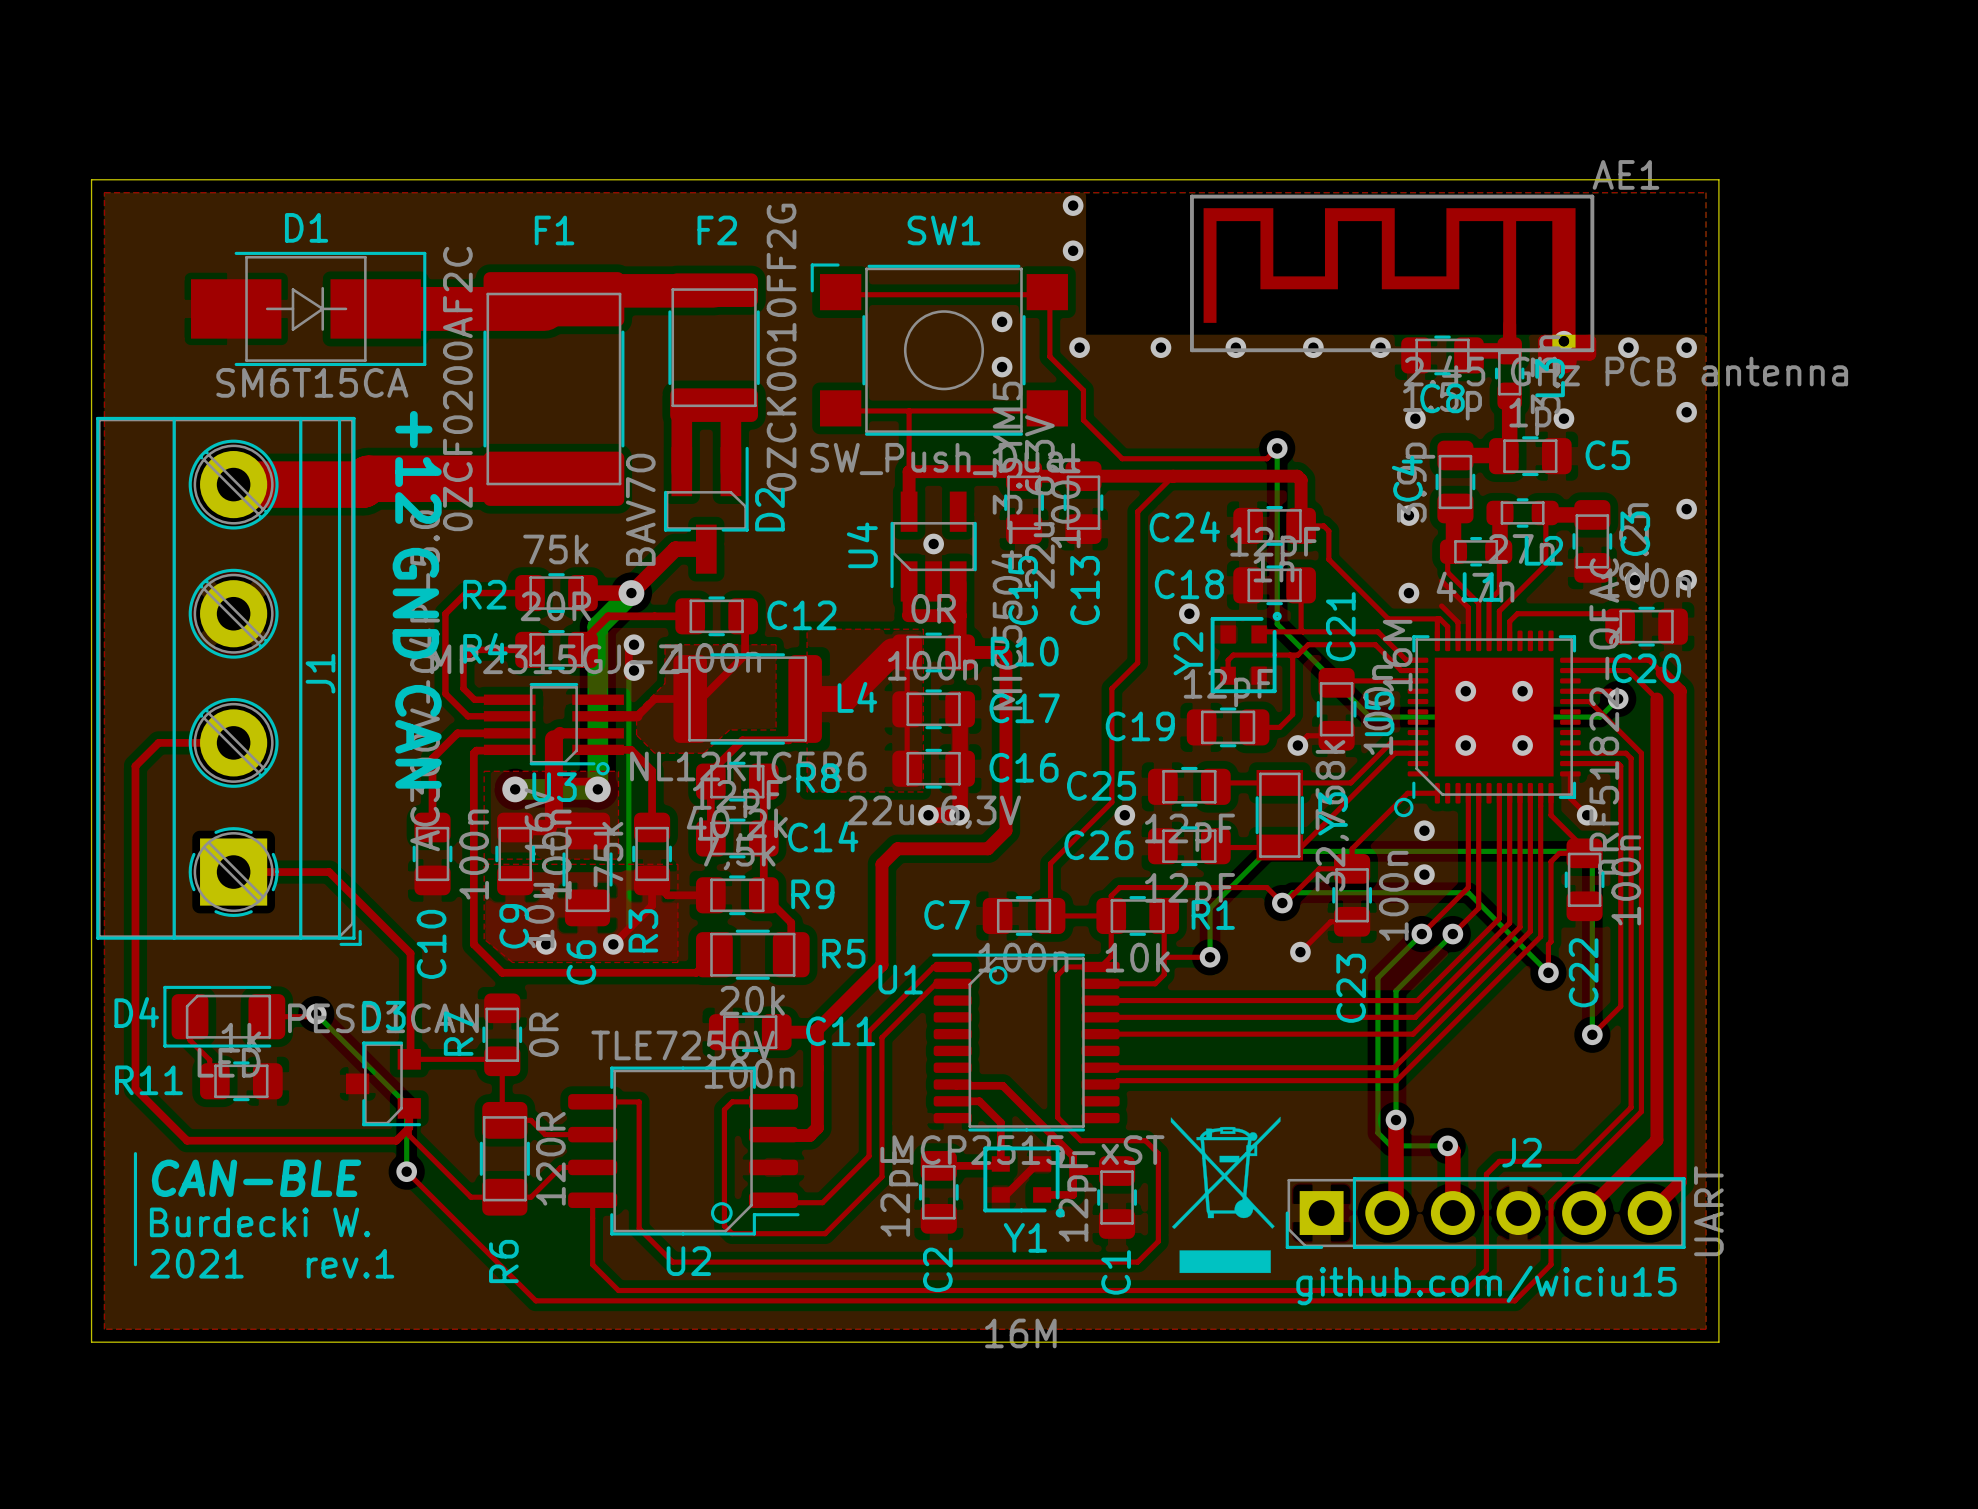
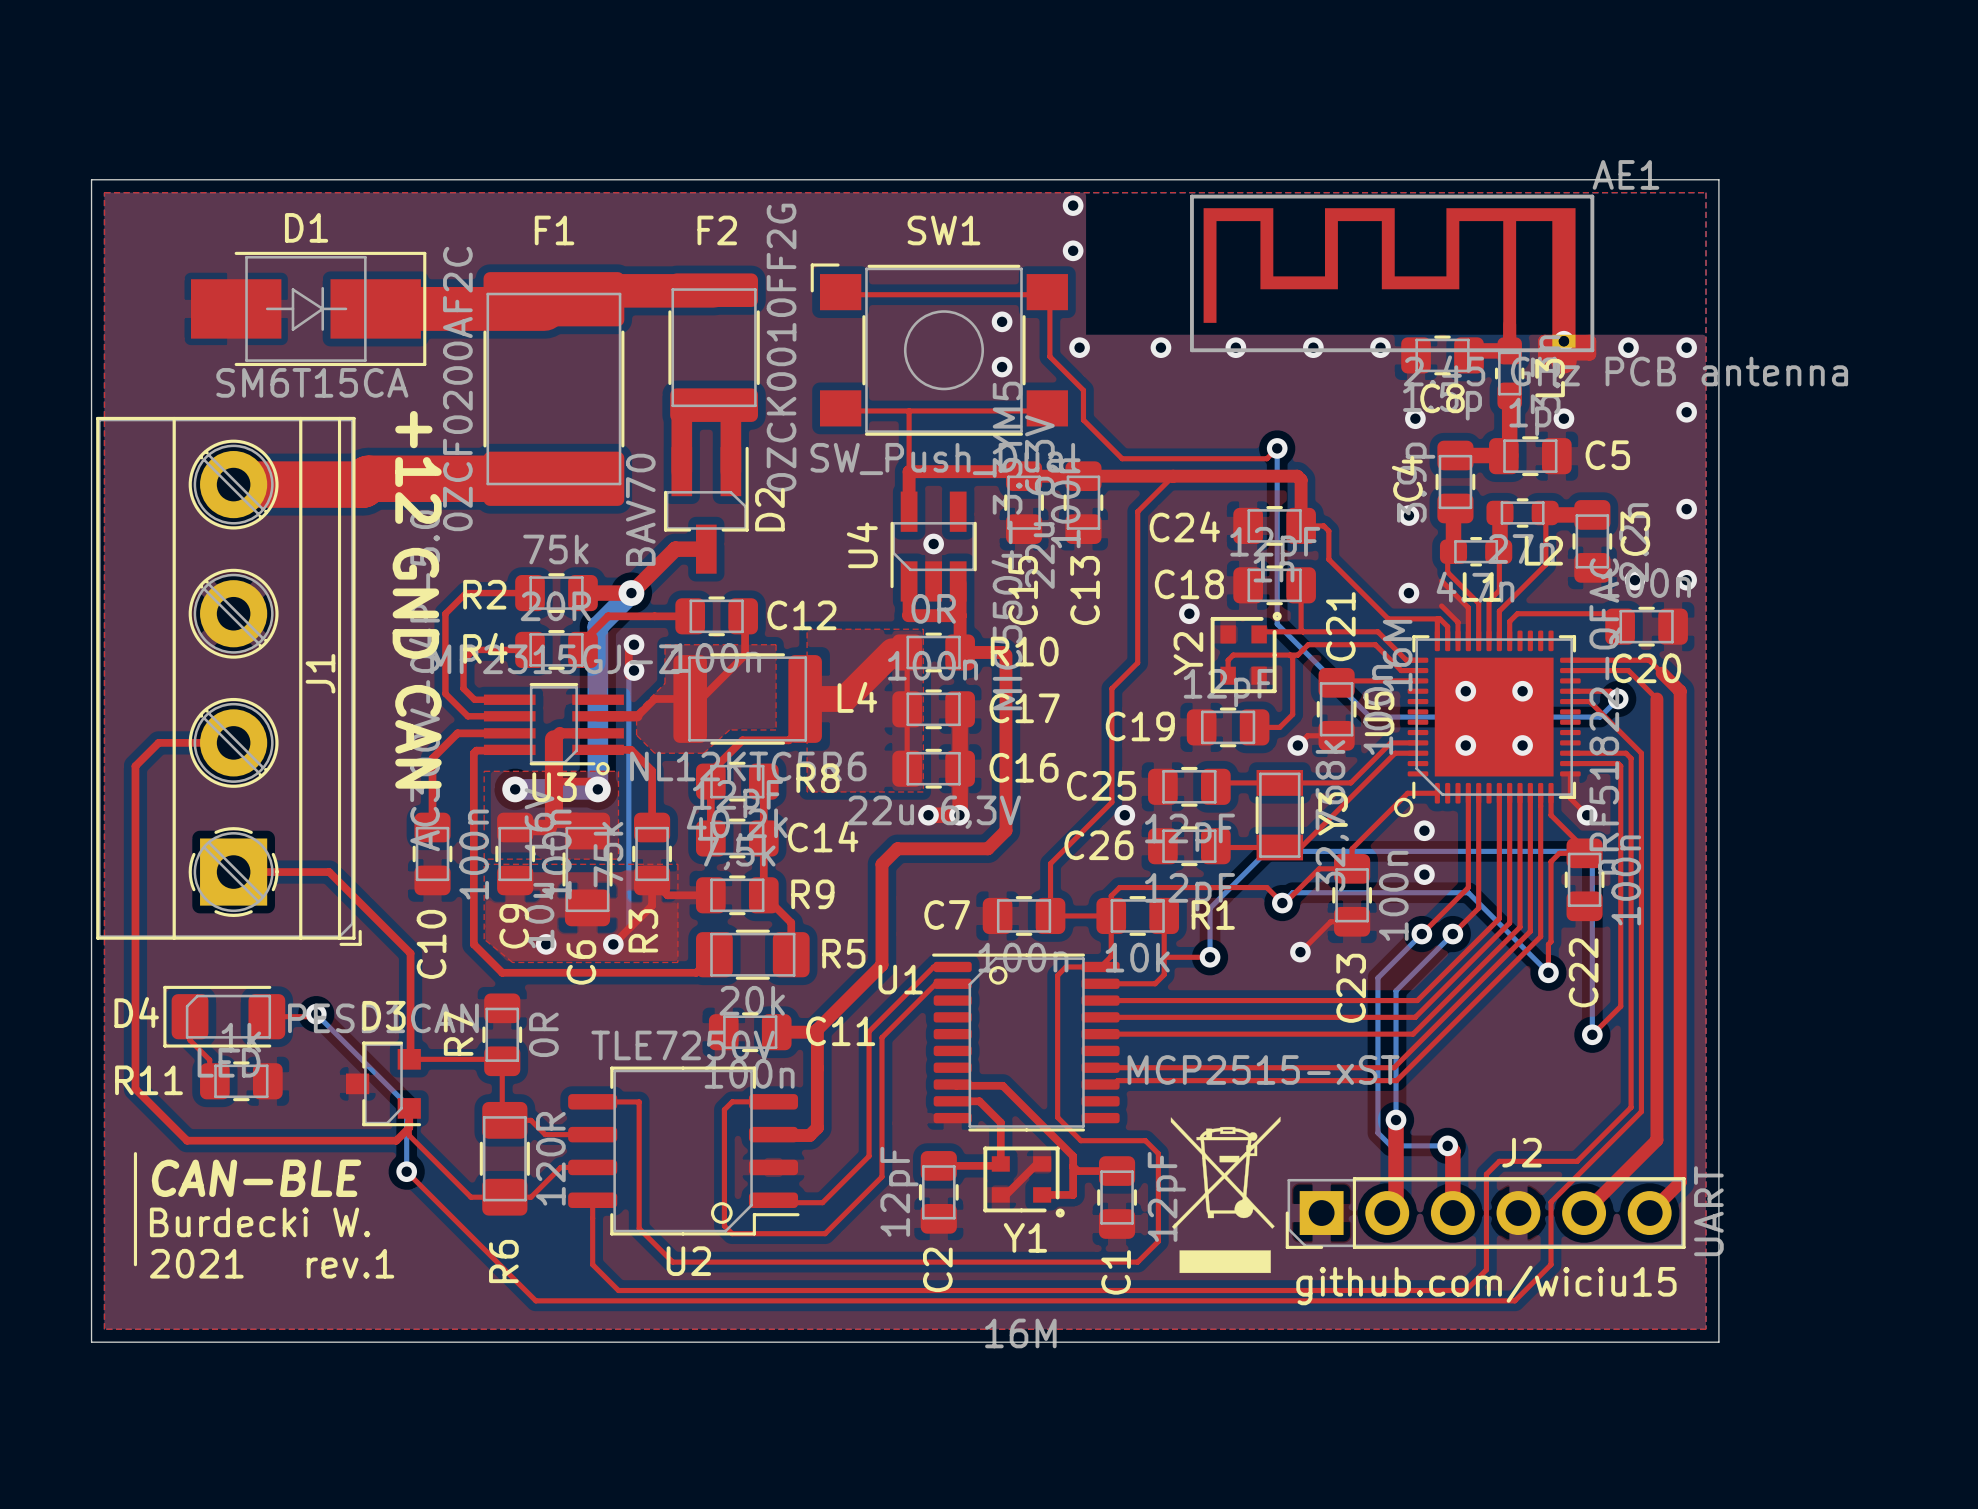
U1 value position: MCP2515-xST (1028, 1150) -> MCP2515-xST (1263, 1069)
C1 value position: 12pF (1077, 1196) -> 12pF (1166, 1196)

